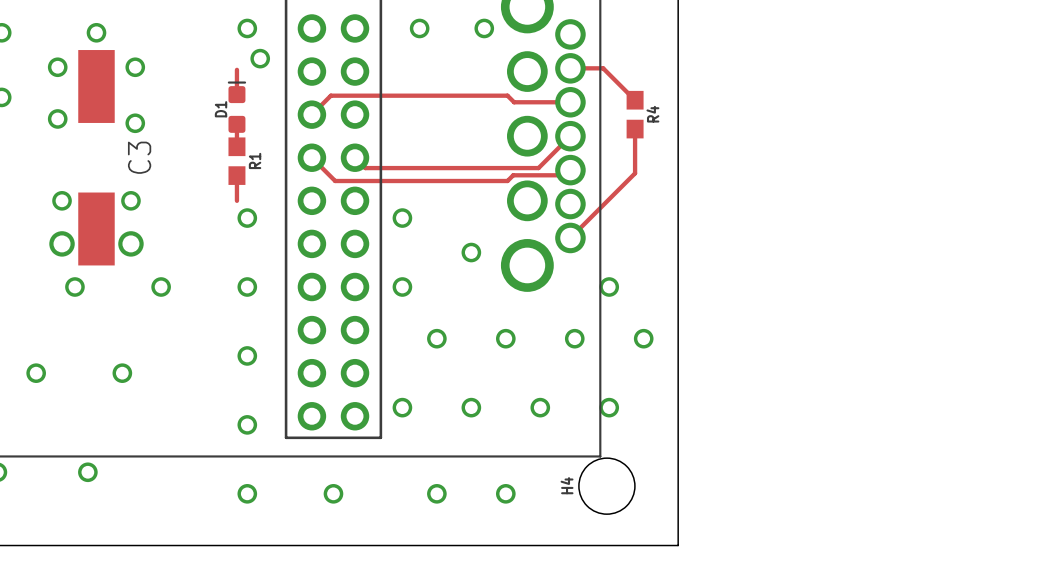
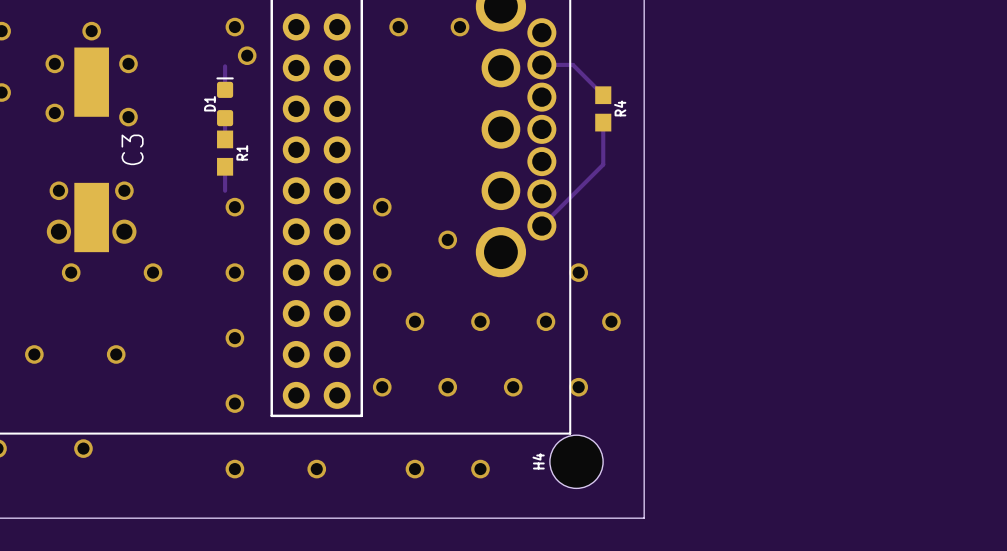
track: (570, 102) (514, 102) (507, 95) (330, 95) (311, 114) -> none
track: (570, 136) (538, 168) (365, 168) (355, 157) -> none
track: (311, 157) (335, 181) (507, 181) (513, 175) (565, 175) (570, 170) -> none

